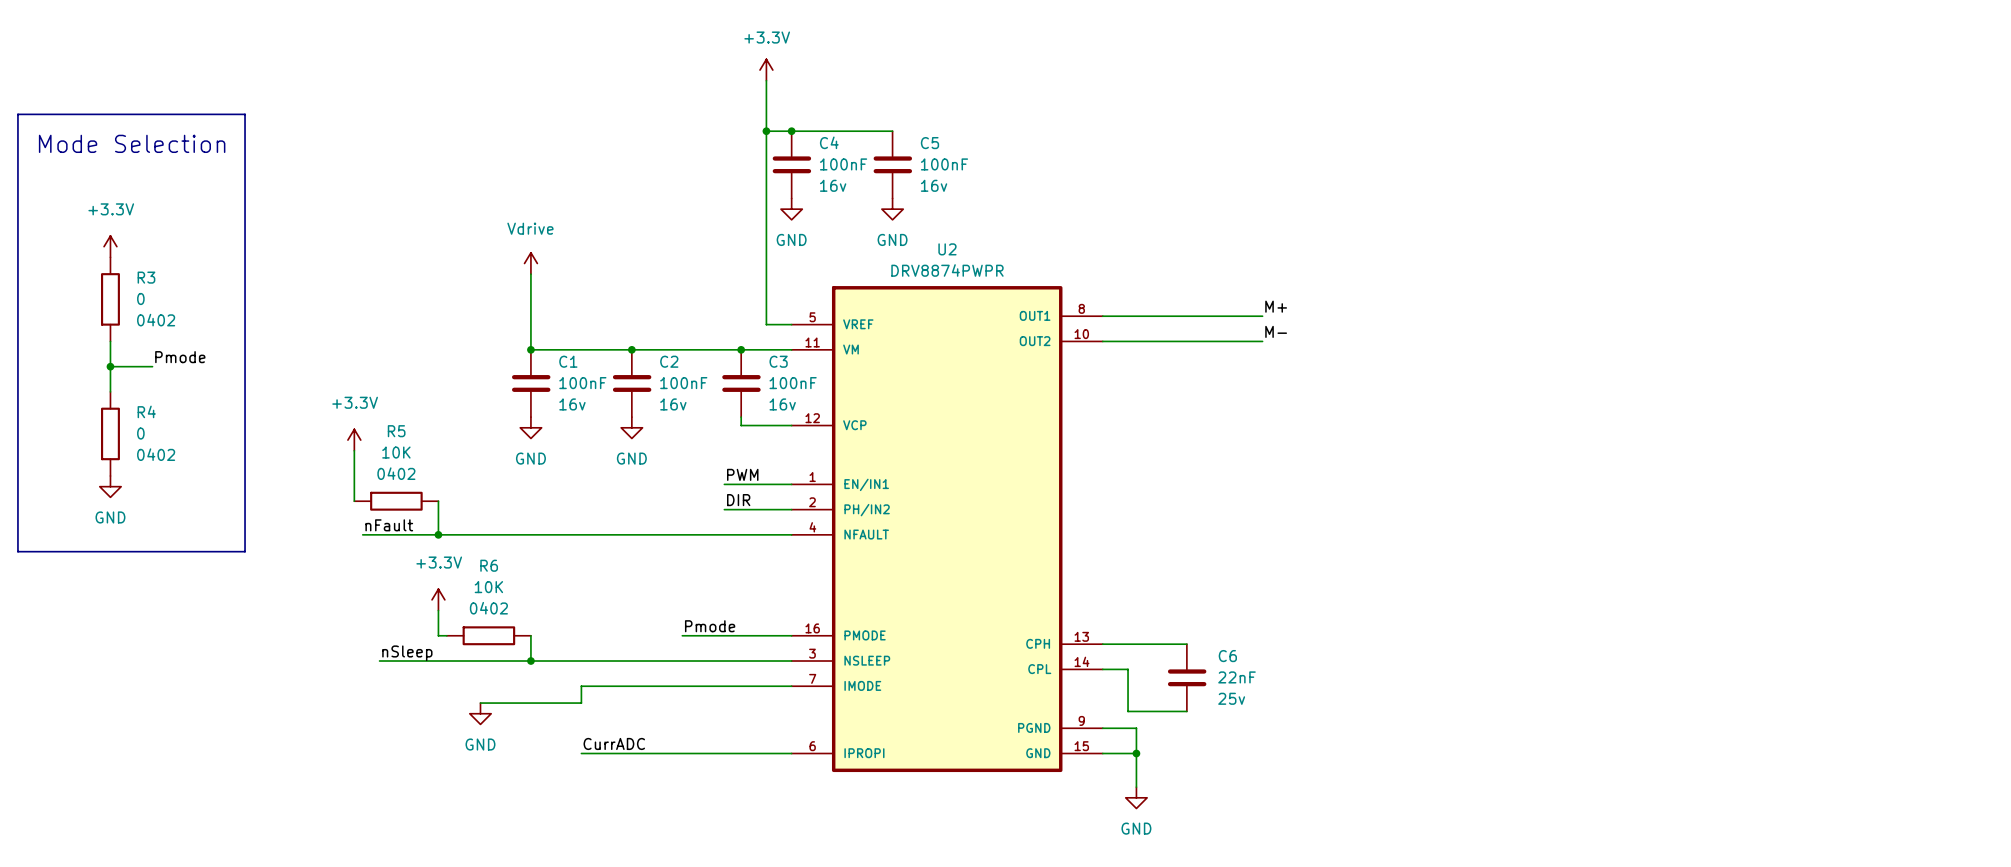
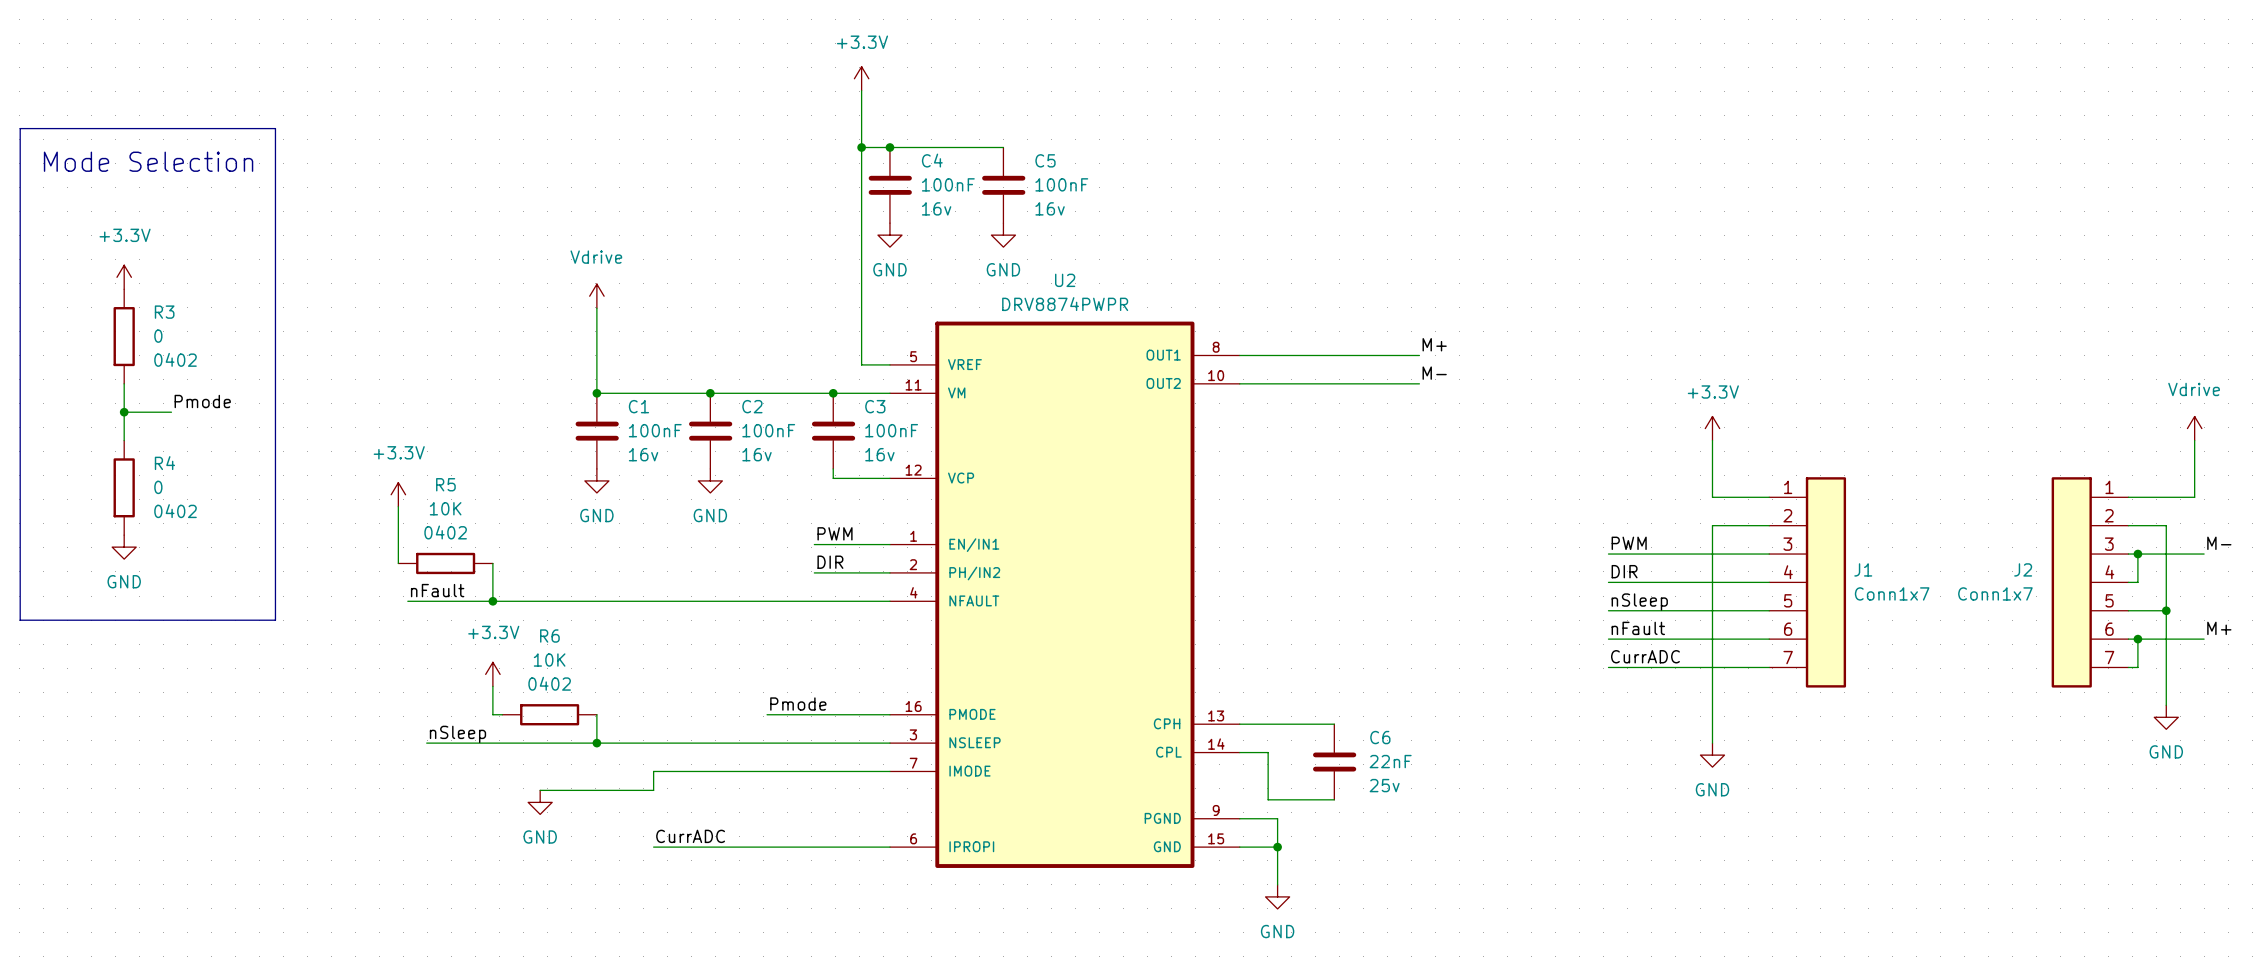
power symbol: none -> +3.3V (1712, 428)
power symbol: none -> Vdrive (2194, 428)
wire: none -> (1712, 440) (1712, 497) (1769, 497)
wire: none -> (2194, 440) (2194, 497) (2128, 497)
wire: none -> (1769, 525) (1712, 525) (1712, 743)
wire: none -> (2128, 525) (2166, 525) (2166, 705)
label: none -> PWM (1629, 543)
label: none -> M- (2219, 543)
wire: none -> (1608, 554) (1769, 554)
wire: none -> (2128, 554) (2204, 554)
wire: none -> (2137, 554) (2137, 582) (2128, 582)
junction: none -> (2137, 554)
label: none -> DIR (1624, 571)
wire: none -> (1608, 582) (1769, 582)
J1: none -> Conn1x7 (1807, 582)
J2: none -> Conn1x7 (2090, 582)
label: none -> nSleep (1639, 602)
wire: none -> (1608, 610) (1769, 610)
wire: none -> (2128, 610) (2166, 610)
junction: none -> (2166, 610)
label: none -> nFault (1638, 628)
label: none -> M+ (2219, 628)
wire: none -> (1608, 639) (1769, 639)
wire: none -> (2128, 639) (2204, 639)
wire: none -> (2137, 639) (2137, 667) (2128, 667)
junction: none -> (2137, 639)
label: none -> CurrADC (1645, 656)
wire: none -> (1608, 667) (1769, 667)
power symbol: none -> GND (2166, 717)
power symbol: none -> GND (1712, 755)

